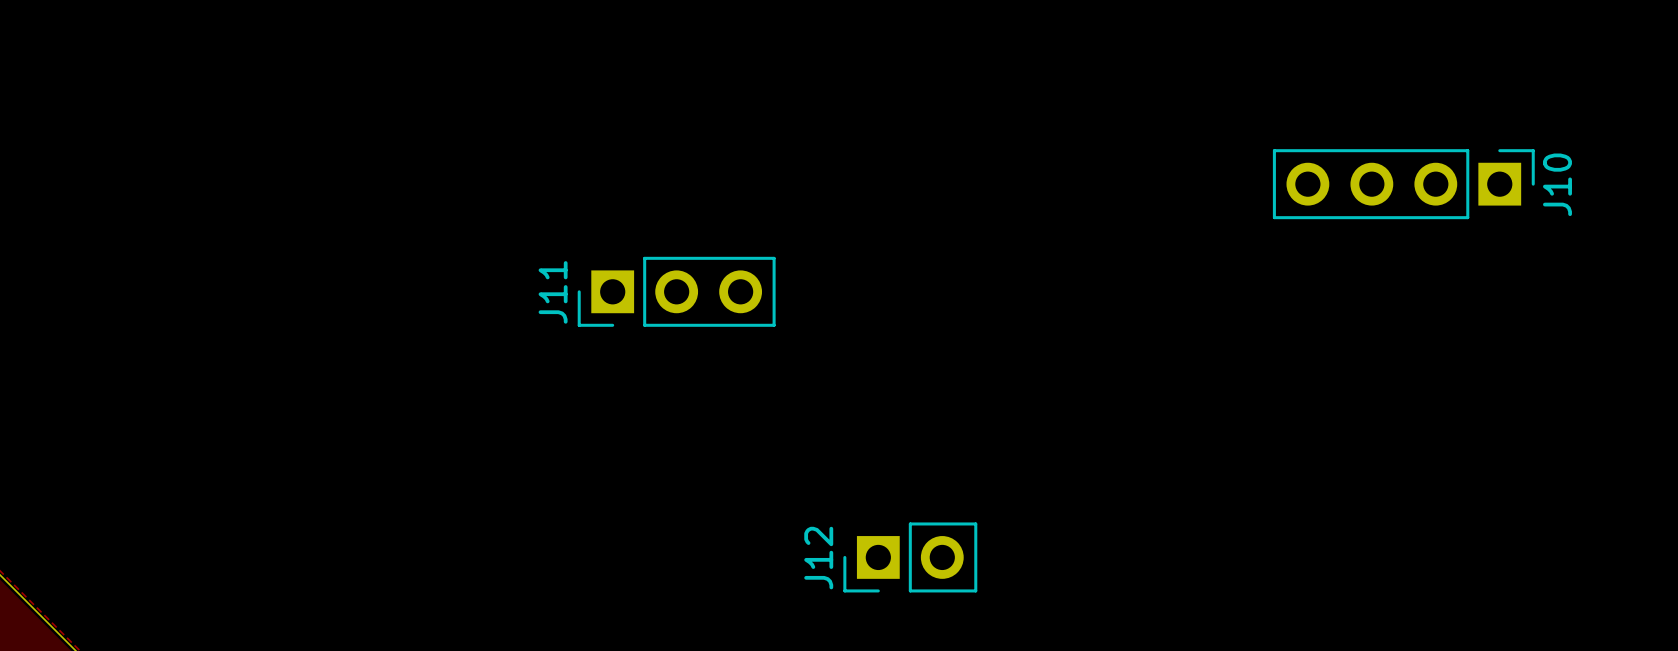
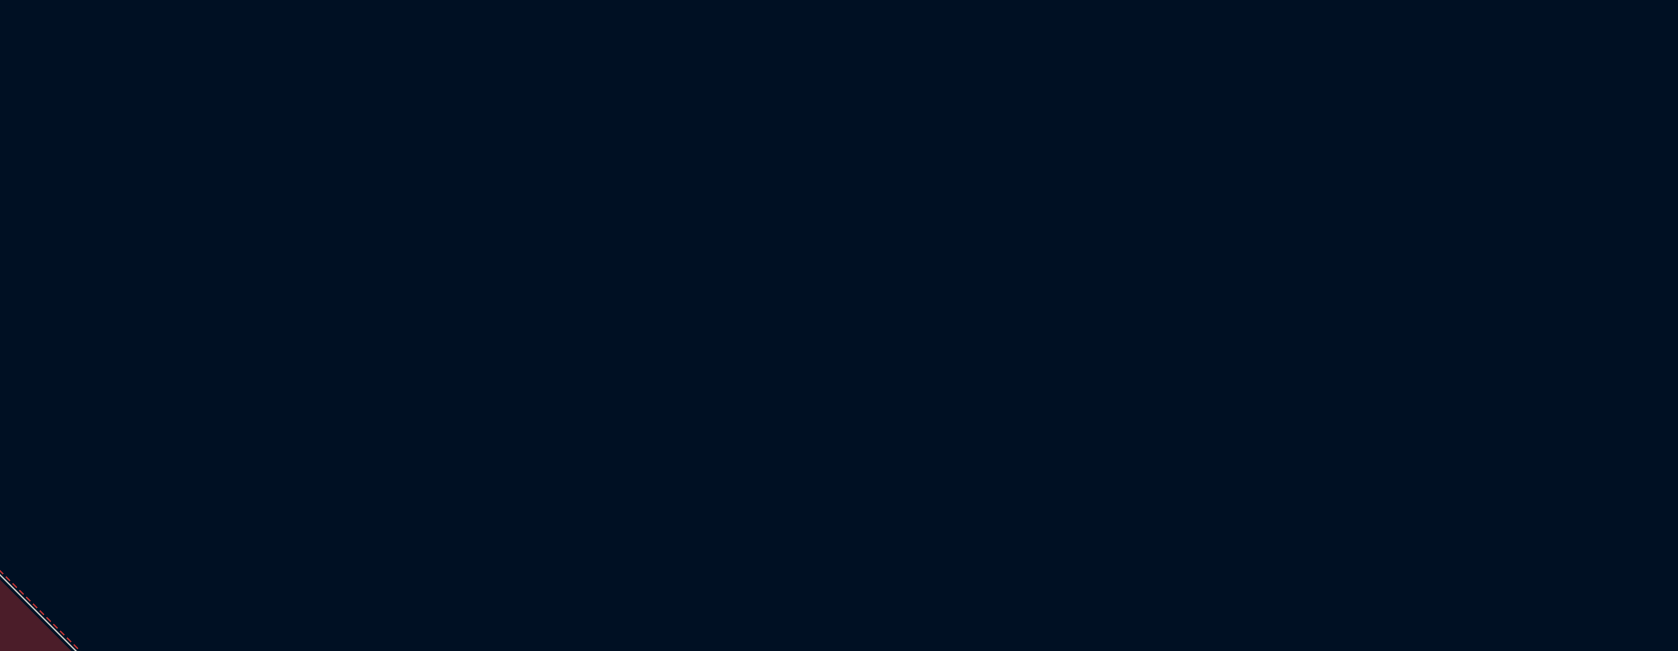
J10: (1403, 184) -> none
J11: (676, 291) -> none
J12: (910, 557) -> none

